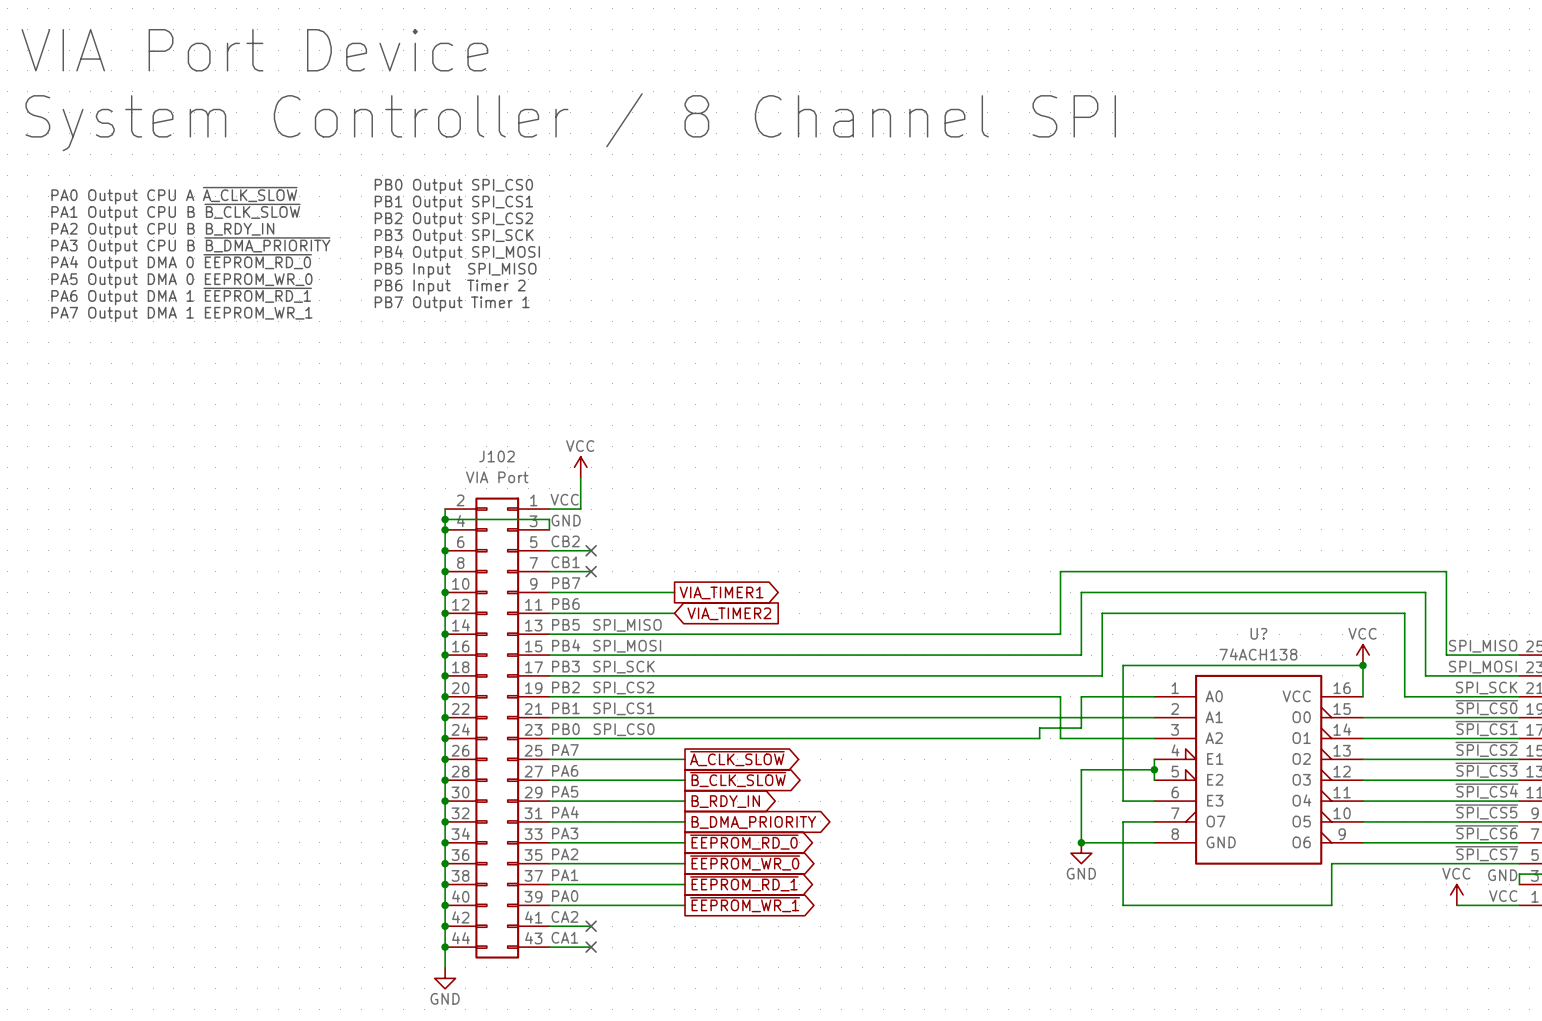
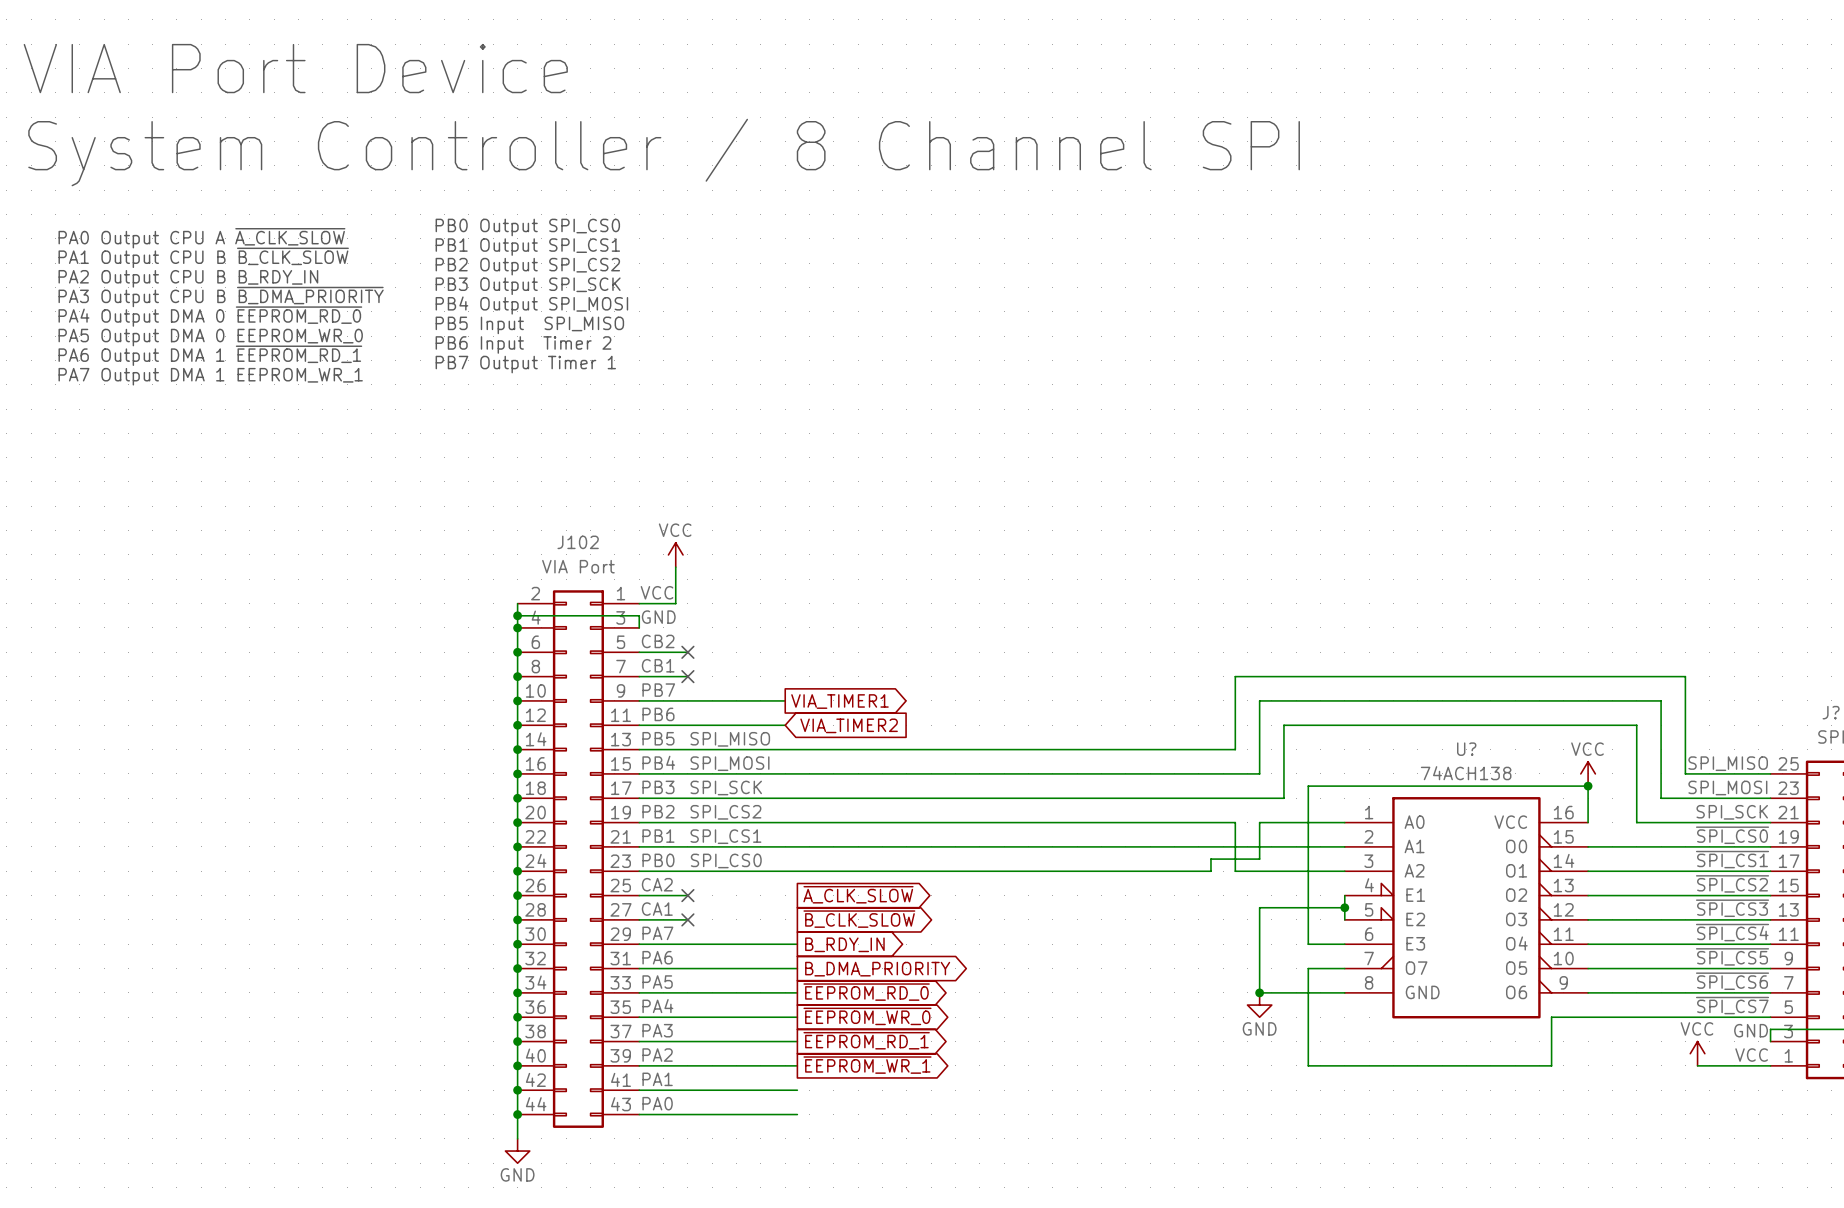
label: PA7 (565, 750) -> CA2 (657, 884)
wire: (591, 759) (685, 759) -> (687, 1090) (797, 1090)
no-connect mark: none -> (687, 895)
label: PA6 (565, 770) -> CA1 (657, 909)
wire: (591, 780) (685, 780) -> (687, 1114) (797, 1114)
no-connect mark: none -> (687, 919)
label: PA5 (565, 791) -> PA7 (657, 933)
label: PA4 (565, 812) -> PA6 (657, 957)
label: PA3 (565, 833) -> PA5 (657, 982)
label: PA2 (565, 854) -> PA4 (657, 1006)
label: PA1 (565, 875) -> PA3 (657, 1030)
label: PA0 (565, 896) -> PA2 (657, 1055)
label: CA2 (564, 916) -> PA1 (657, 1079)
no-connect mark: (591, 926) -> none
label: CA1 (564, 937) -> PA0 (657, 1103)
no-connect mark: (591, 947) -> none

